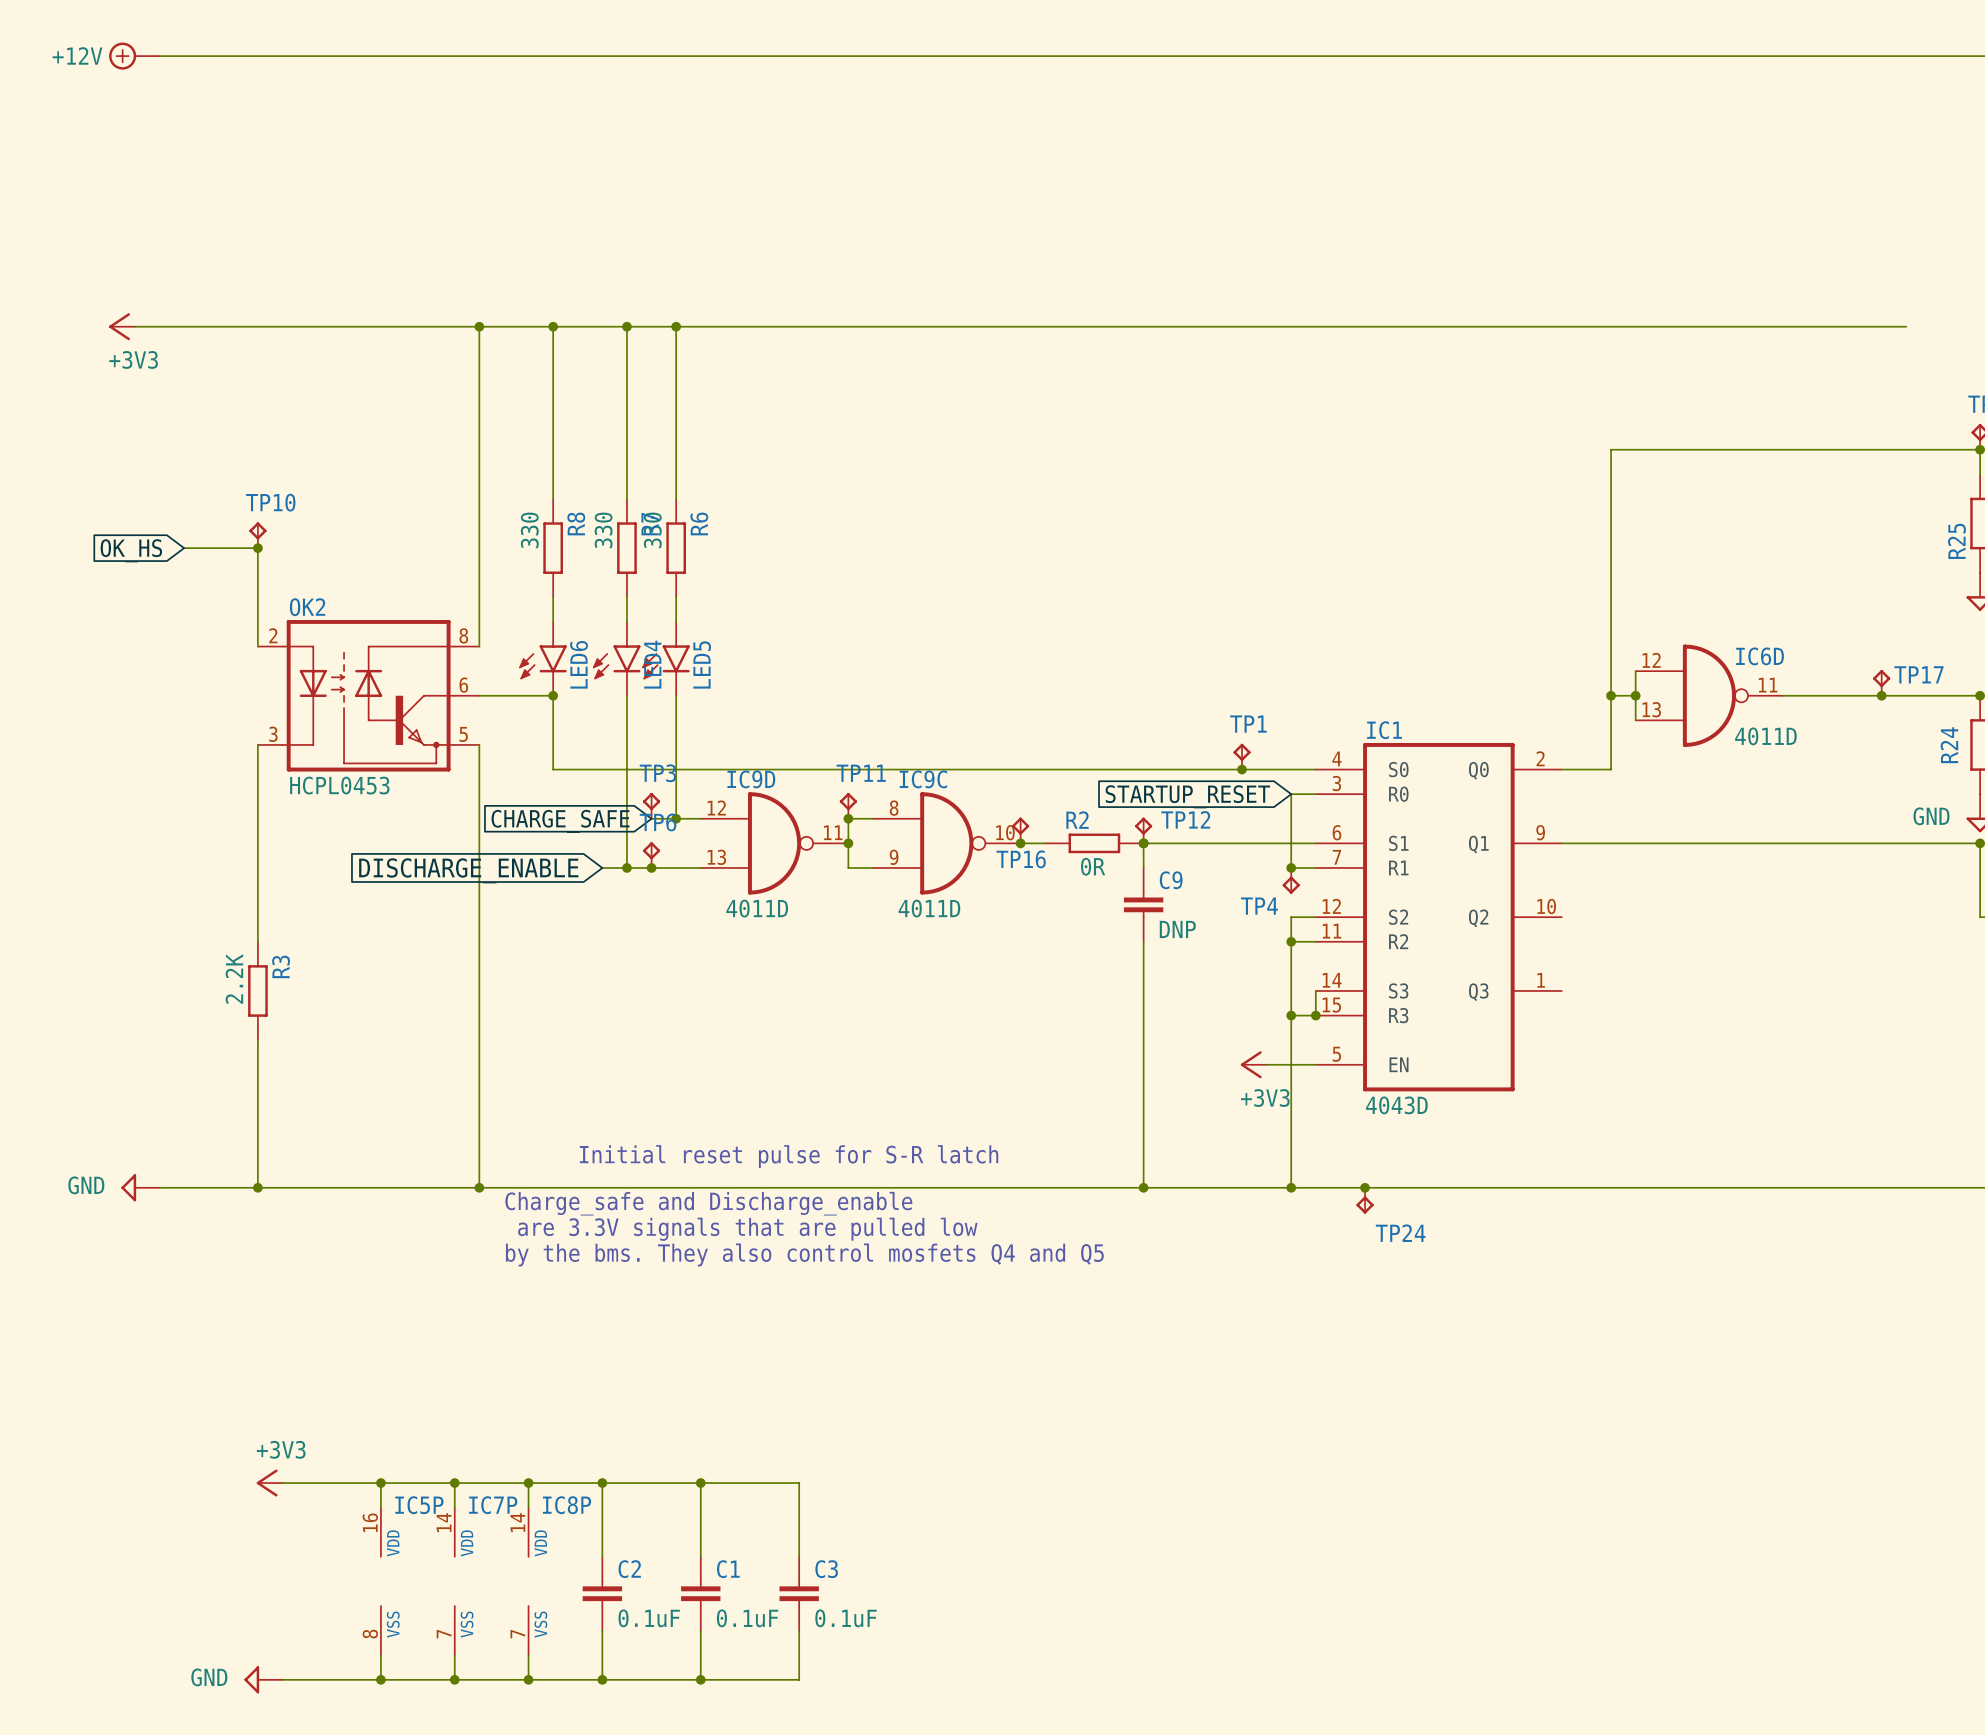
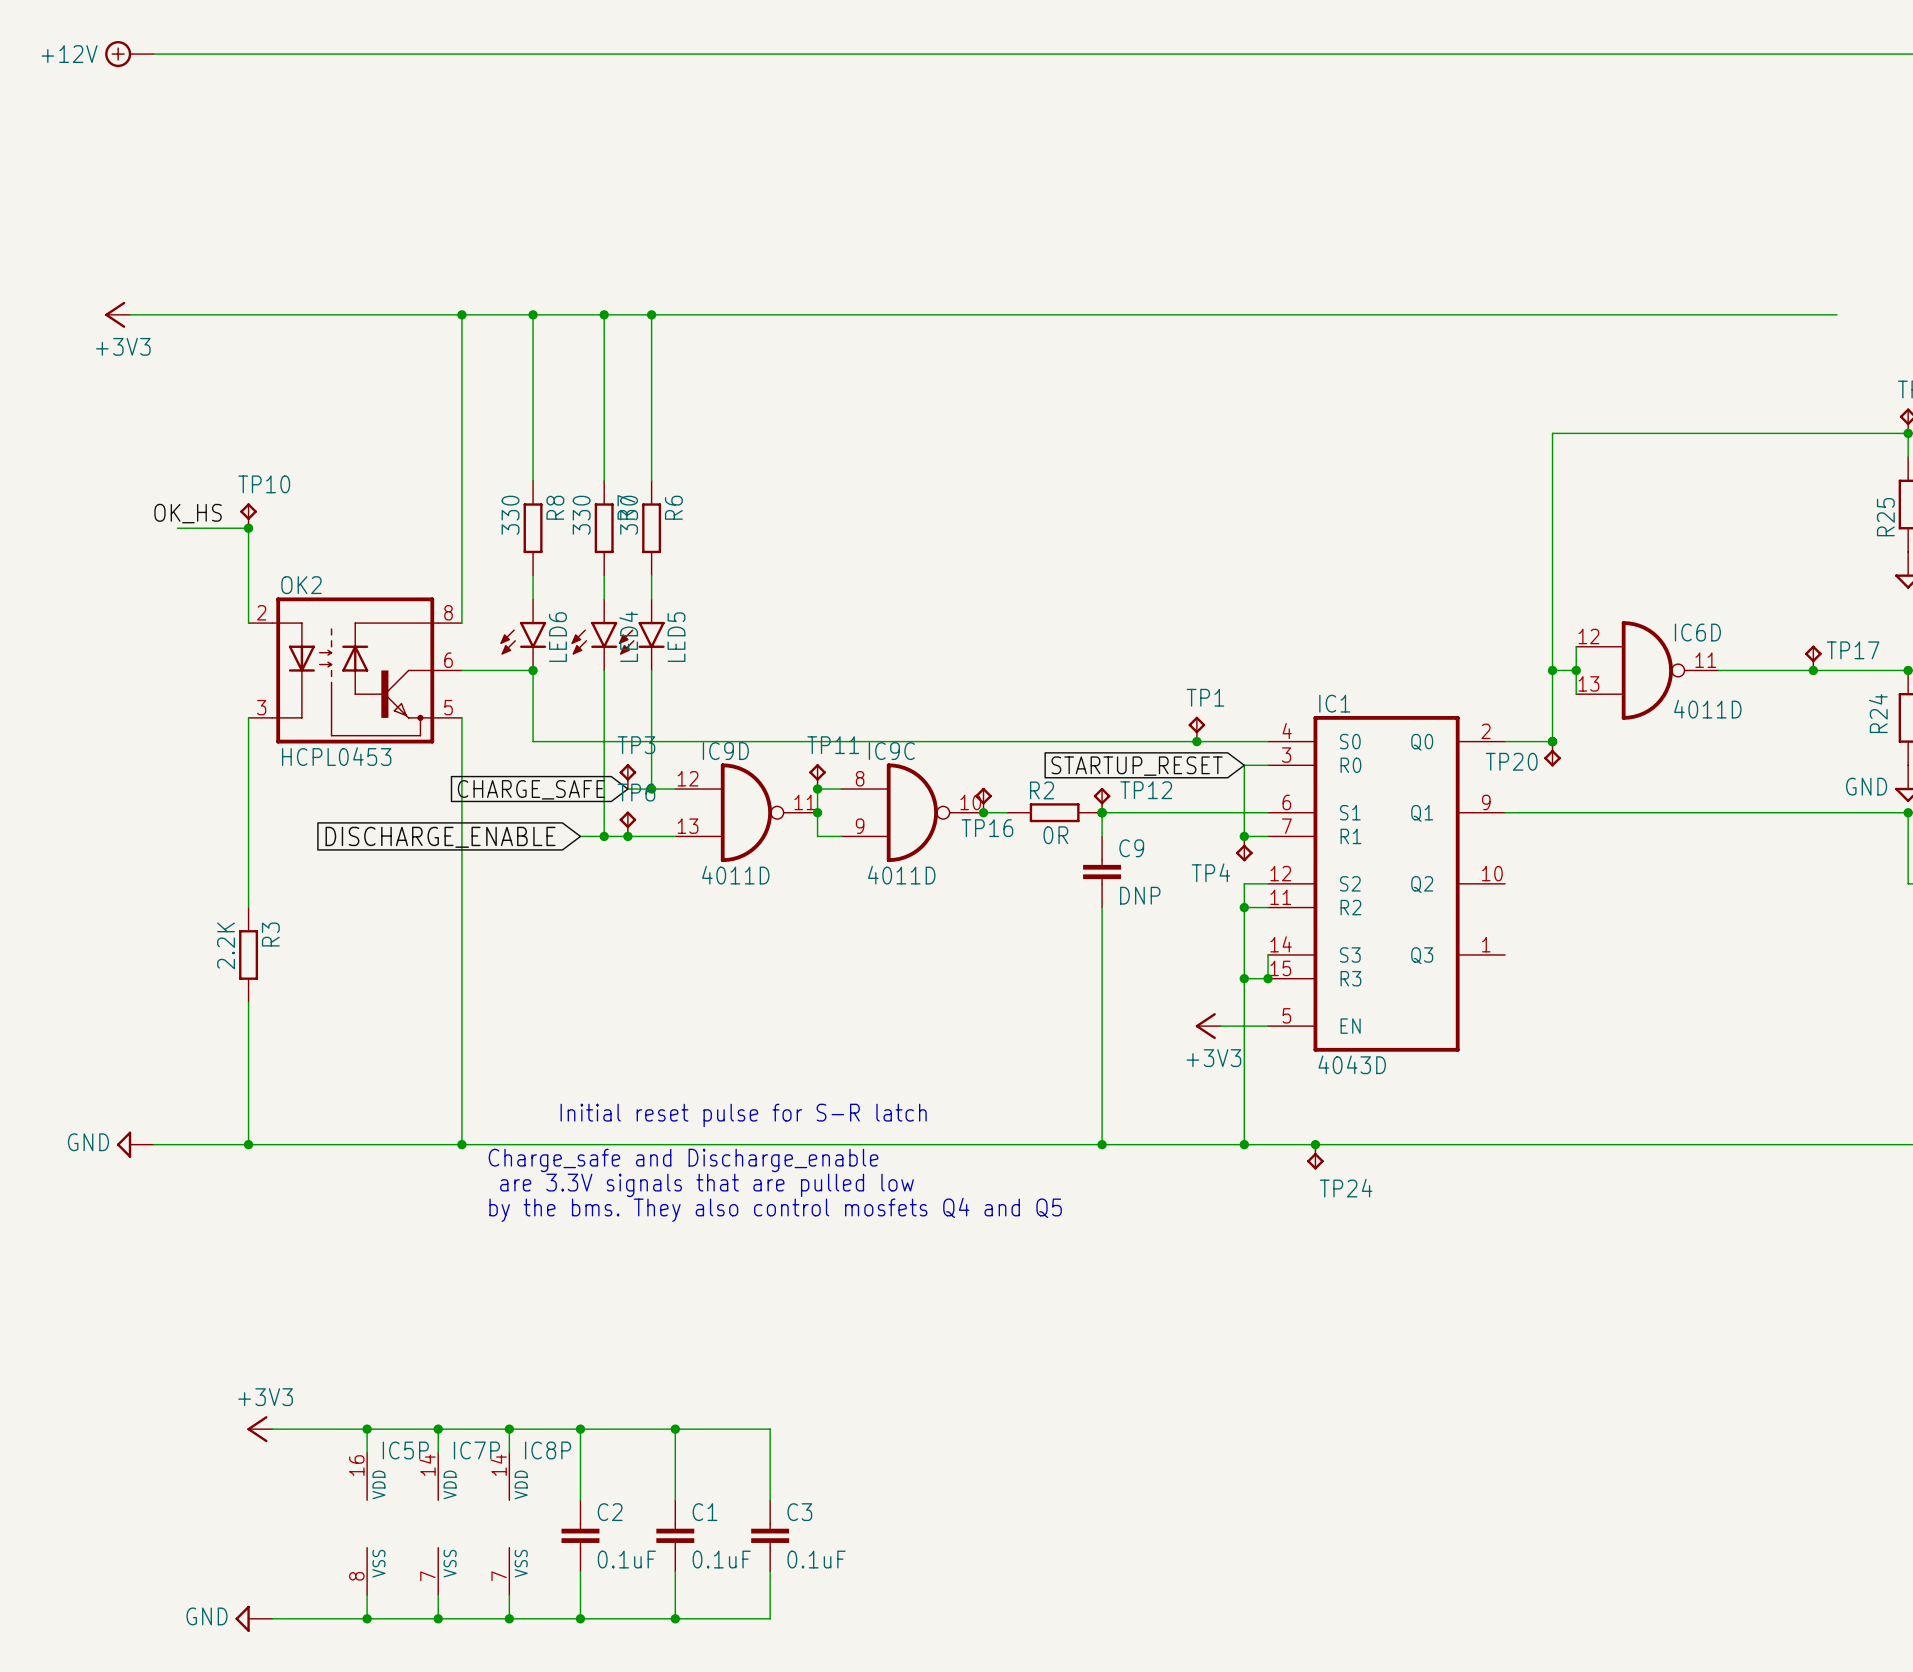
label: none -> OK_HS (188, 513)
global label: OK_HS (131, 550) -> none
junction: none -> (1552, 741)
TP20: none -> (1552, 754)

